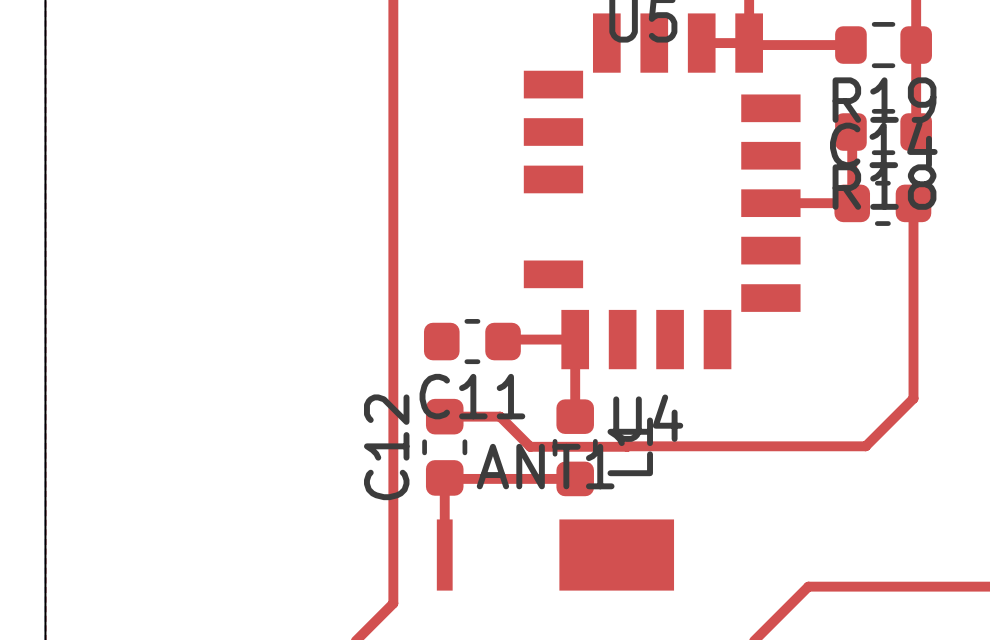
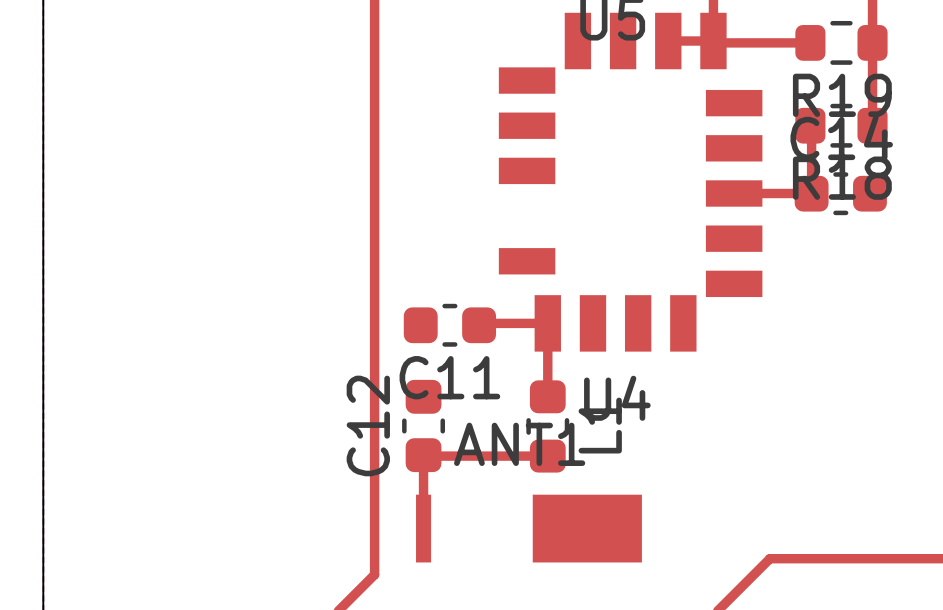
top track: (913, 203) (913, 398) (865, 446) (627, 446) -> none
top track: (444, 416) (500, 416) (530, 446) (627, 446) -> none

